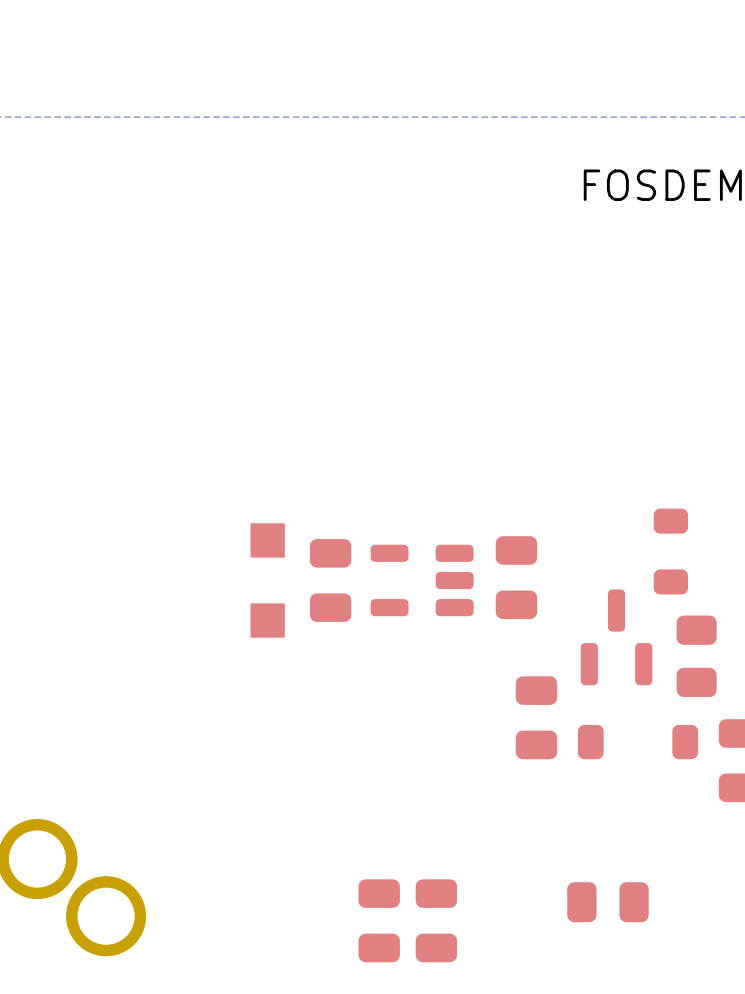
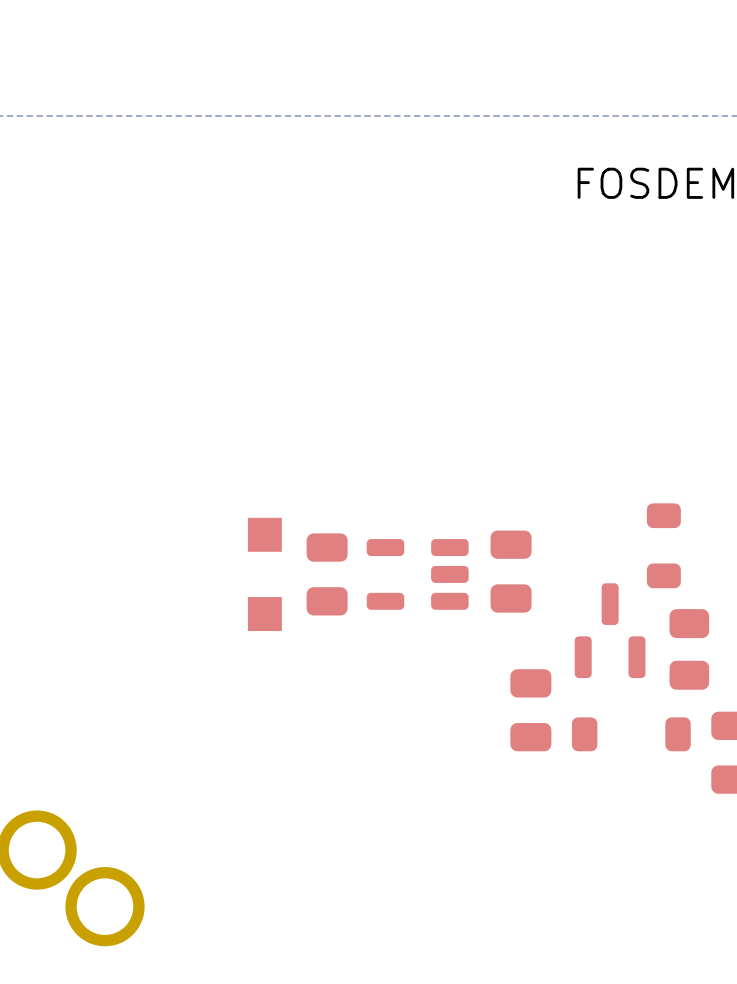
part: (607, 902) -> none
part: (379, 920) -> none
part: (436, 920) -> none

